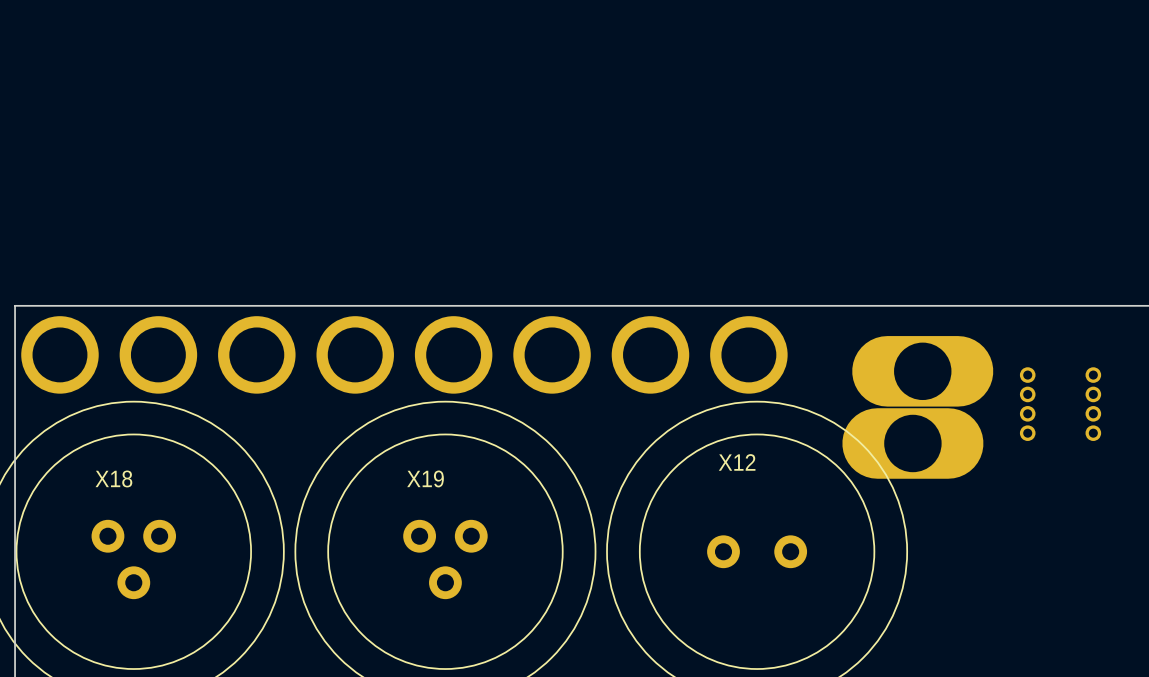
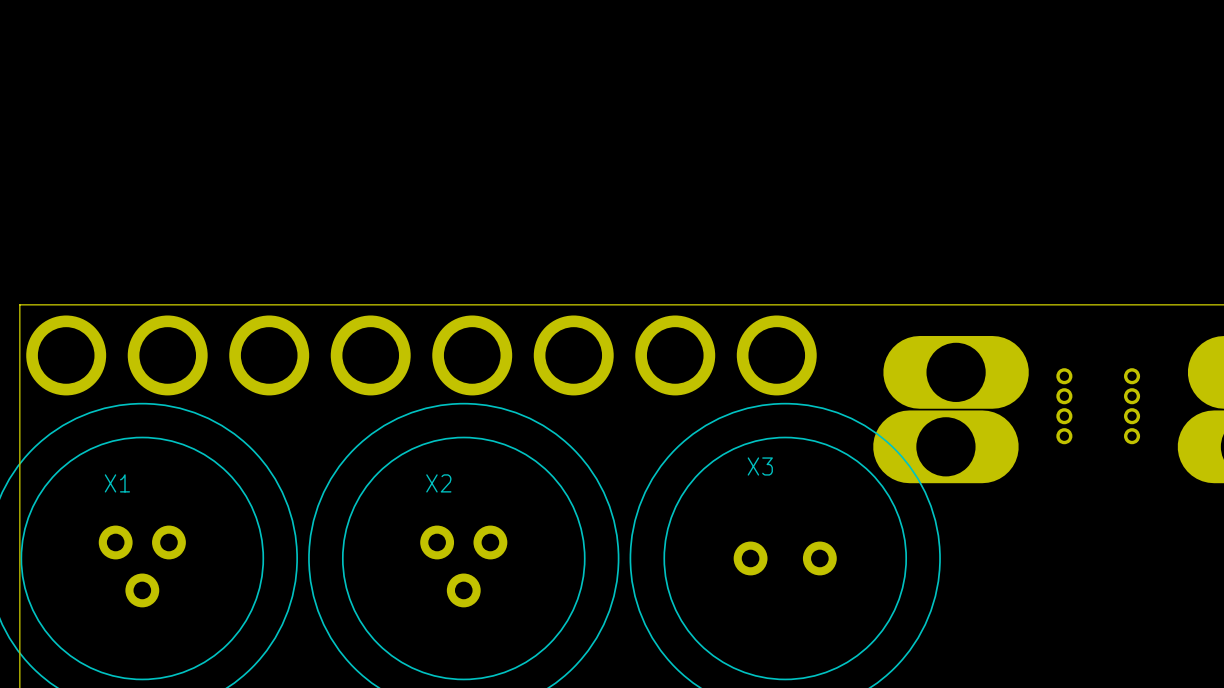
X12 name: X12 (737, 462) -> X3 (760, 466)
X18 name: X18 (113, 478) -> X1 (117, 483)
X19 name: X19 (425, 478) -> X2 (438, 483)

